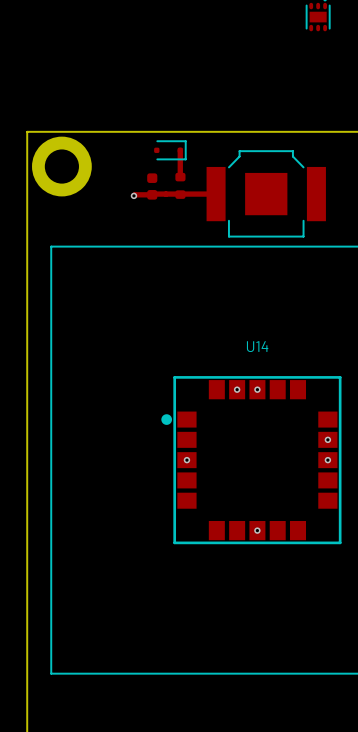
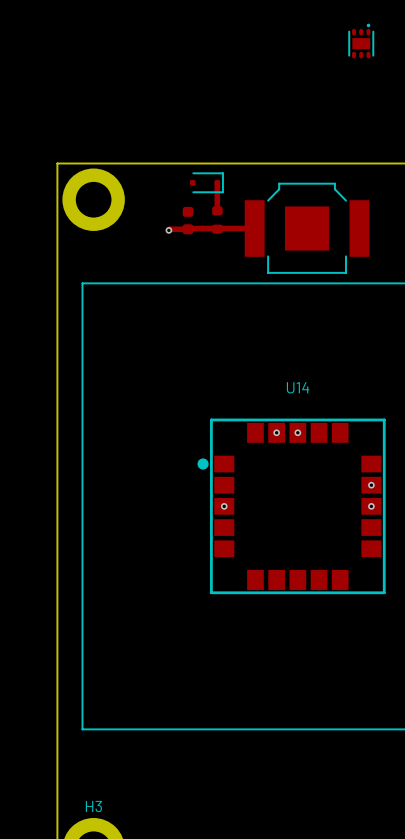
via: (257, 530) -> none

